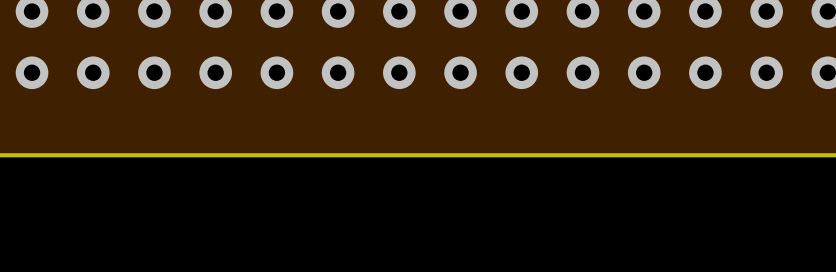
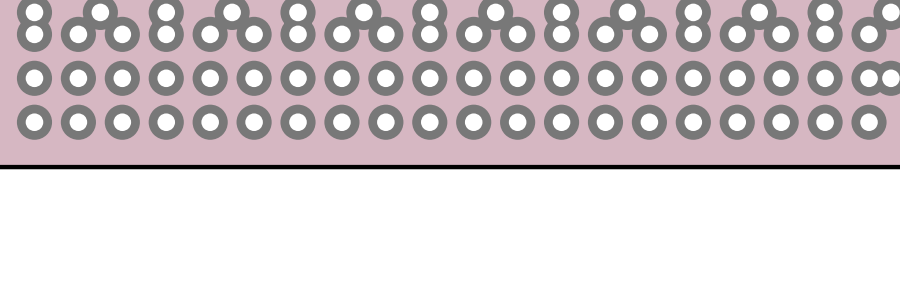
via: none -> (34, 34)
via: none -> (78, 34)
via: none -> (122, 34)
via: none -> (166, 34)
via: none -> (210, 34)
via: none -> (254, 34)
via: none -> (298, 34)
via: none -> (341, 34)
via: none -> (385, 34)
via: none -> (429, 34)
via: none -> (473, 34)
via: none -> (517, 34)
via: none -> (561, 34)
via: none -> (605, 34)
via: none -> (649, 34)
via: none -> (693, 34)
via: none -> (737, 34)
via: none -> (781, 34)
via: none -> (825, 34)
via: none -> (869, 34)
via: none -> (78, 78)
via: (93, 72) -> none
via: none -> (122, 78)
via: none -> (210, 78)
via: (215, 72) -> none
via: none -> (254, 78)
via: none -> (341, 78)
via: (338, 72) -> none
via: none -> (385, 78)
via: none -> (473, 78)
via: (460, 72) -> none
via: none -> (517, 78)
via: none -> (605, 78)
via: (582, 72) -> none
via: none -> (649, 78)
via: none -> (737, 78)
via: (705, 72) -> none
via: none -> (781, 78)
via: none -> (869, 78)
via: none -> (34, 122)
via: none -> (78, 122)
via: none -> (122, 122)
via: none -> (166, 122)
via: none -> (210, 122)
via: none -> (254, 122)
via: none -> (298, 122)
via: none -> (341, 122)
via: none -> (385, 122)
via: none -> (429, 122)
via: none -> (473, 122)
via: none -> (517, 122)
via: none -> (561, 122)
via: none -> (605, 122)
via: none -> (649, 122)
via: none -> (693, 122)
via: none -> (737, 122)
via: none -> (781, 122)
via: none -> (825, 122)
via: none -> (869, 122)

